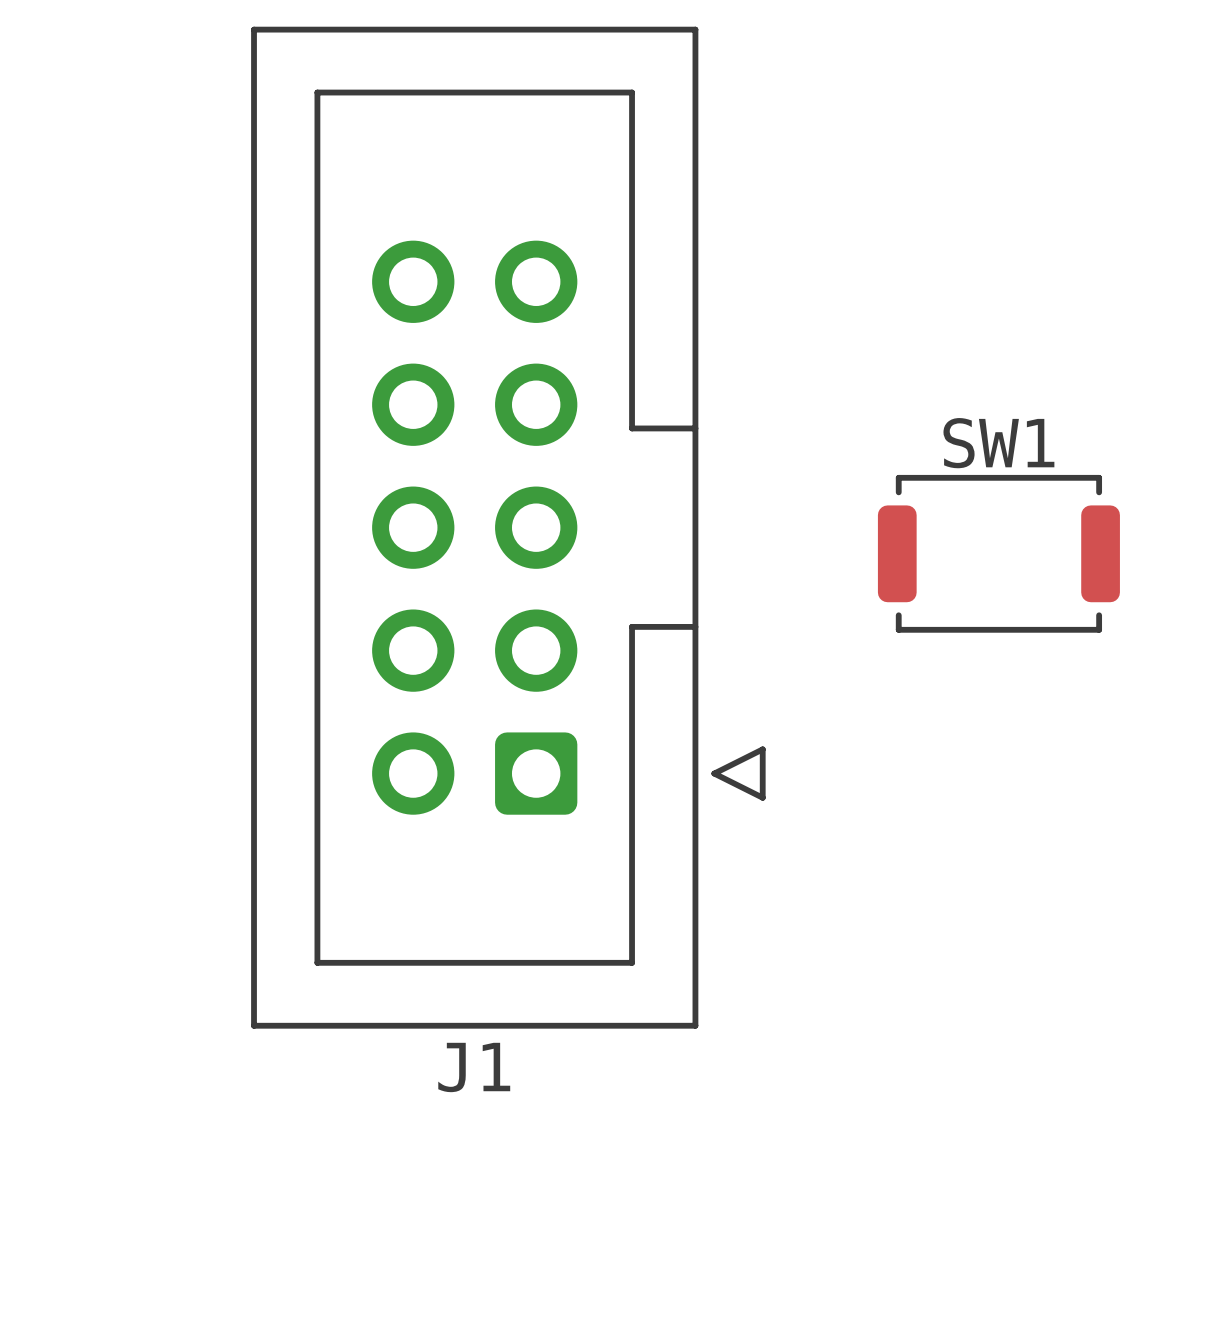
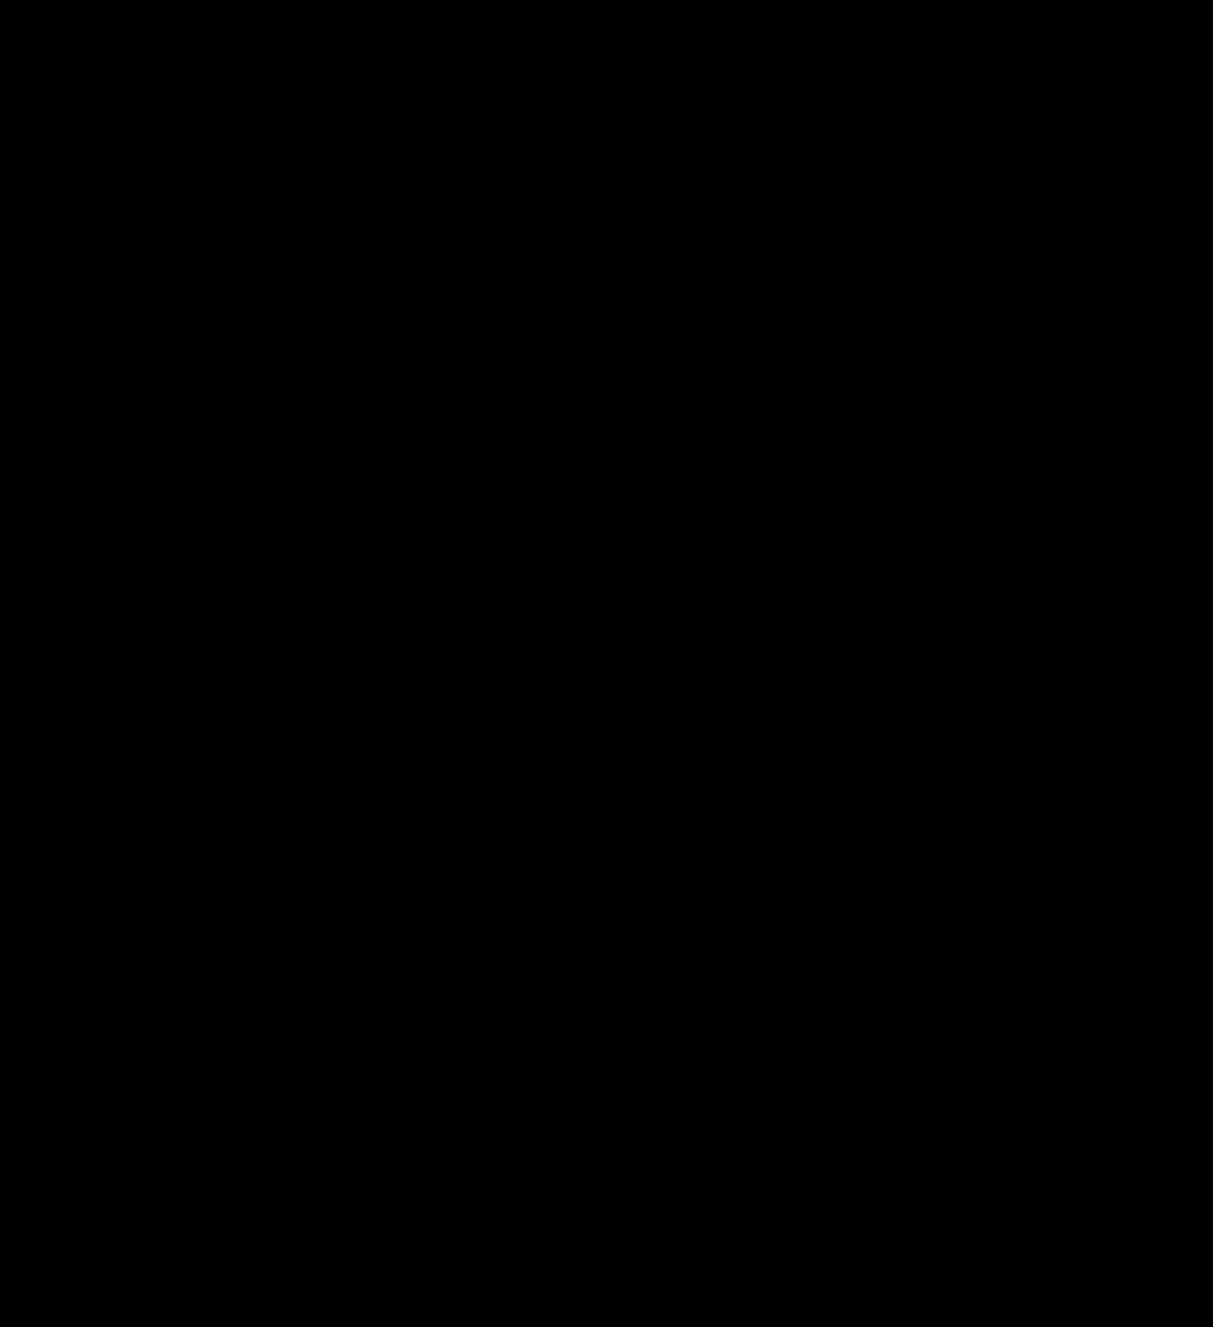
J1: (508, 527) -> none
SW1: (998, 553) -> none

